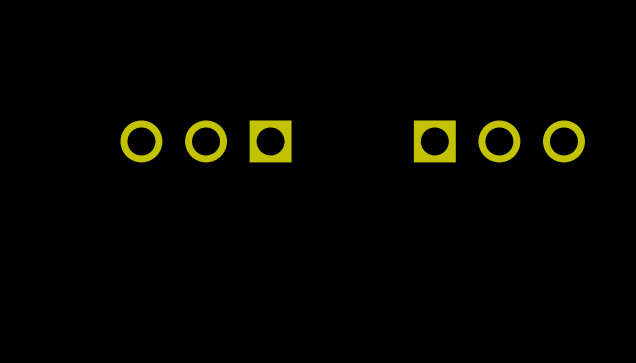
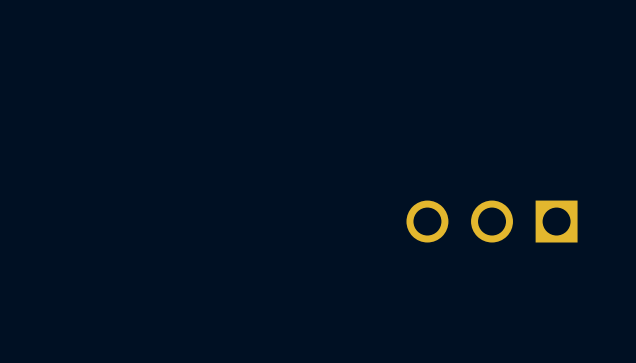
part: (206, 141) -> none
part rotation: 0° (499, 141) -> 180° (492, 221)

